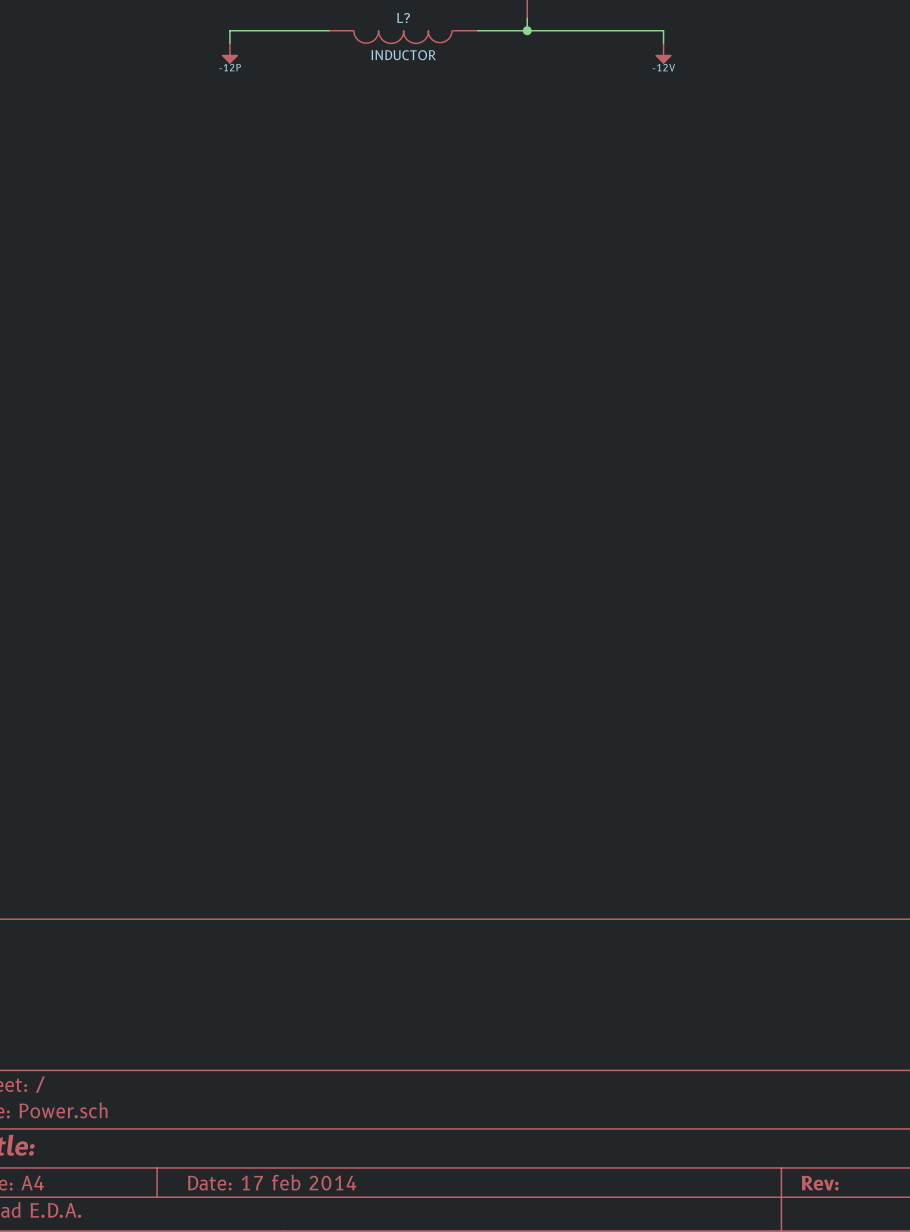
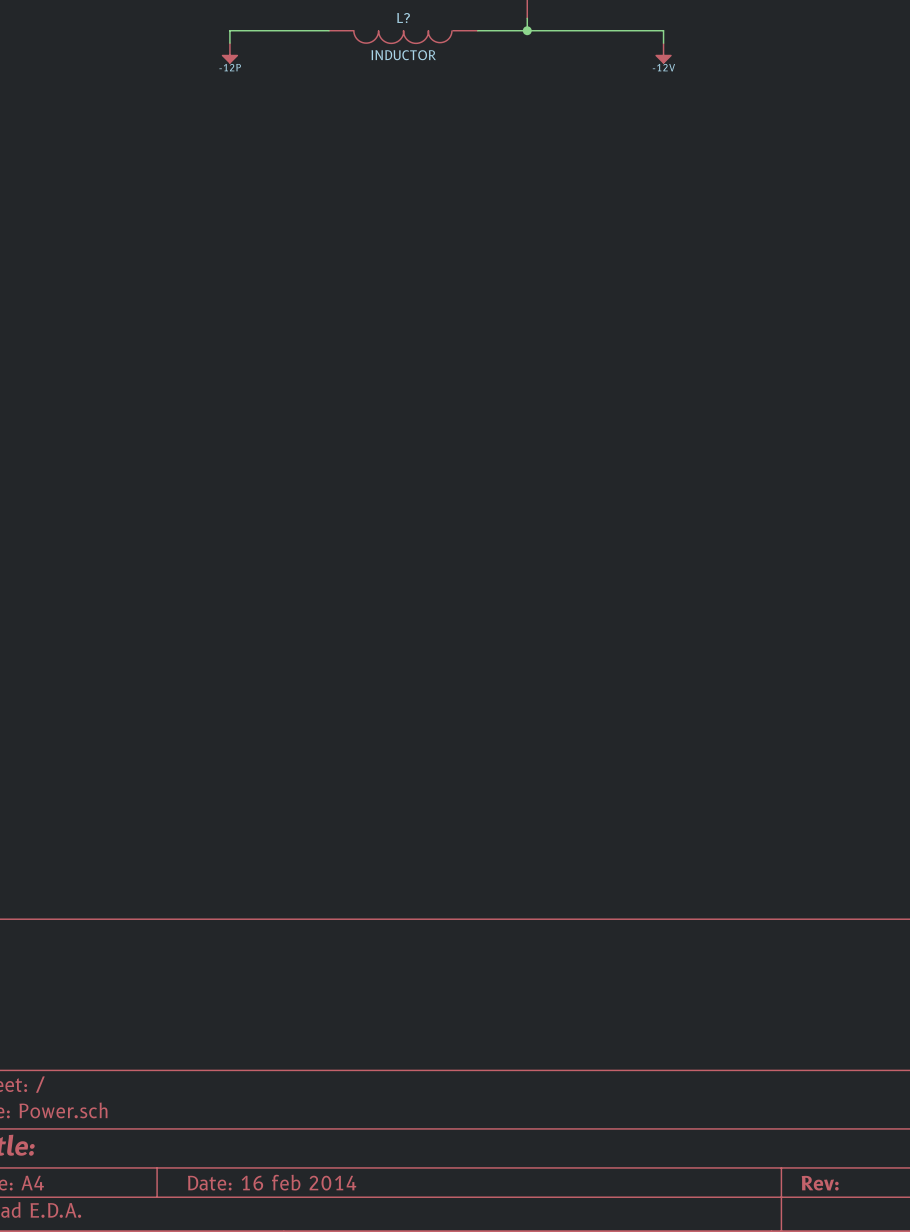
title block: Date: 17 feb 2014 (272, 1182) -> Date: 16 feb 2014 (272, 1182)

